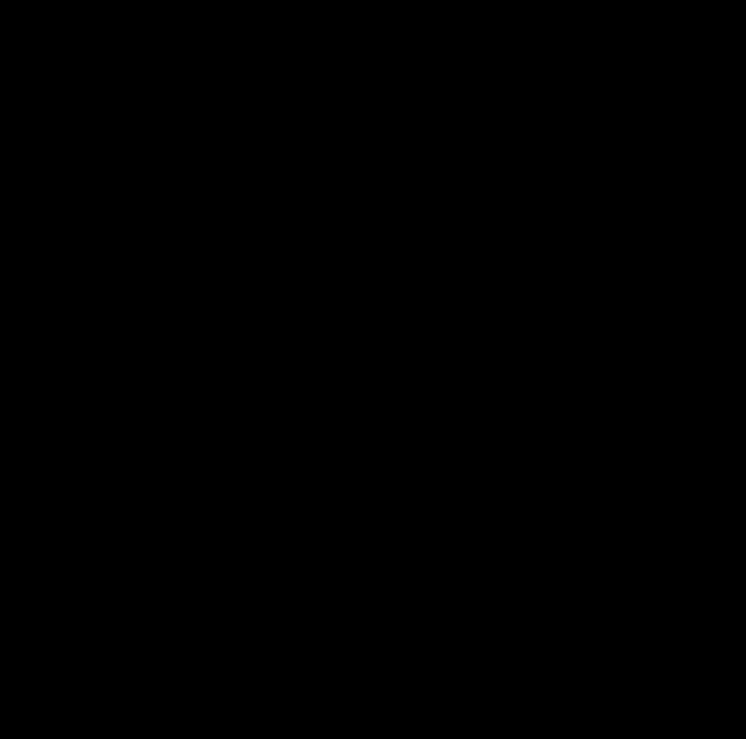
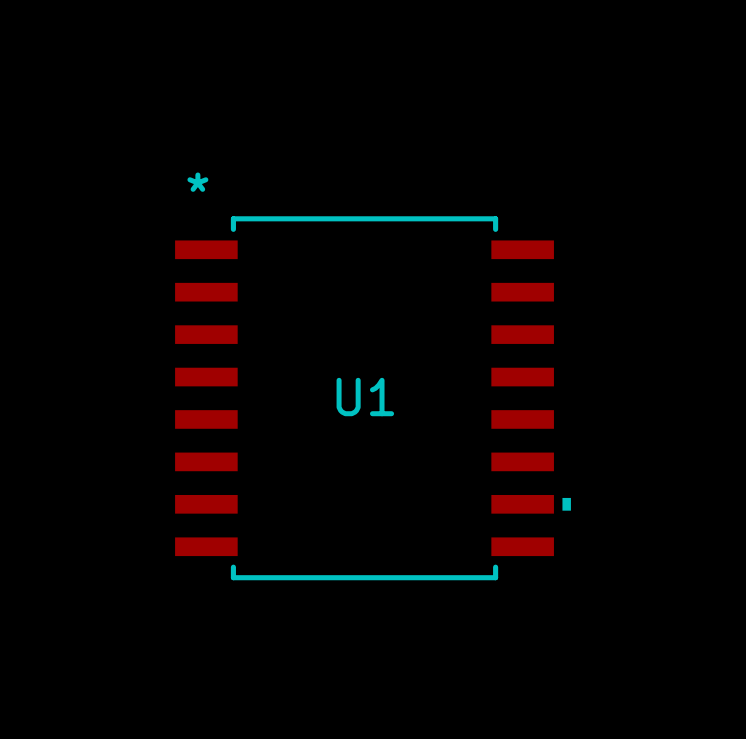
U1: none -> (373, 398)

